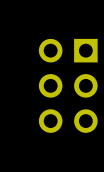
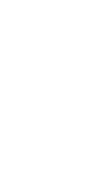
part: (68, 85) -> none

